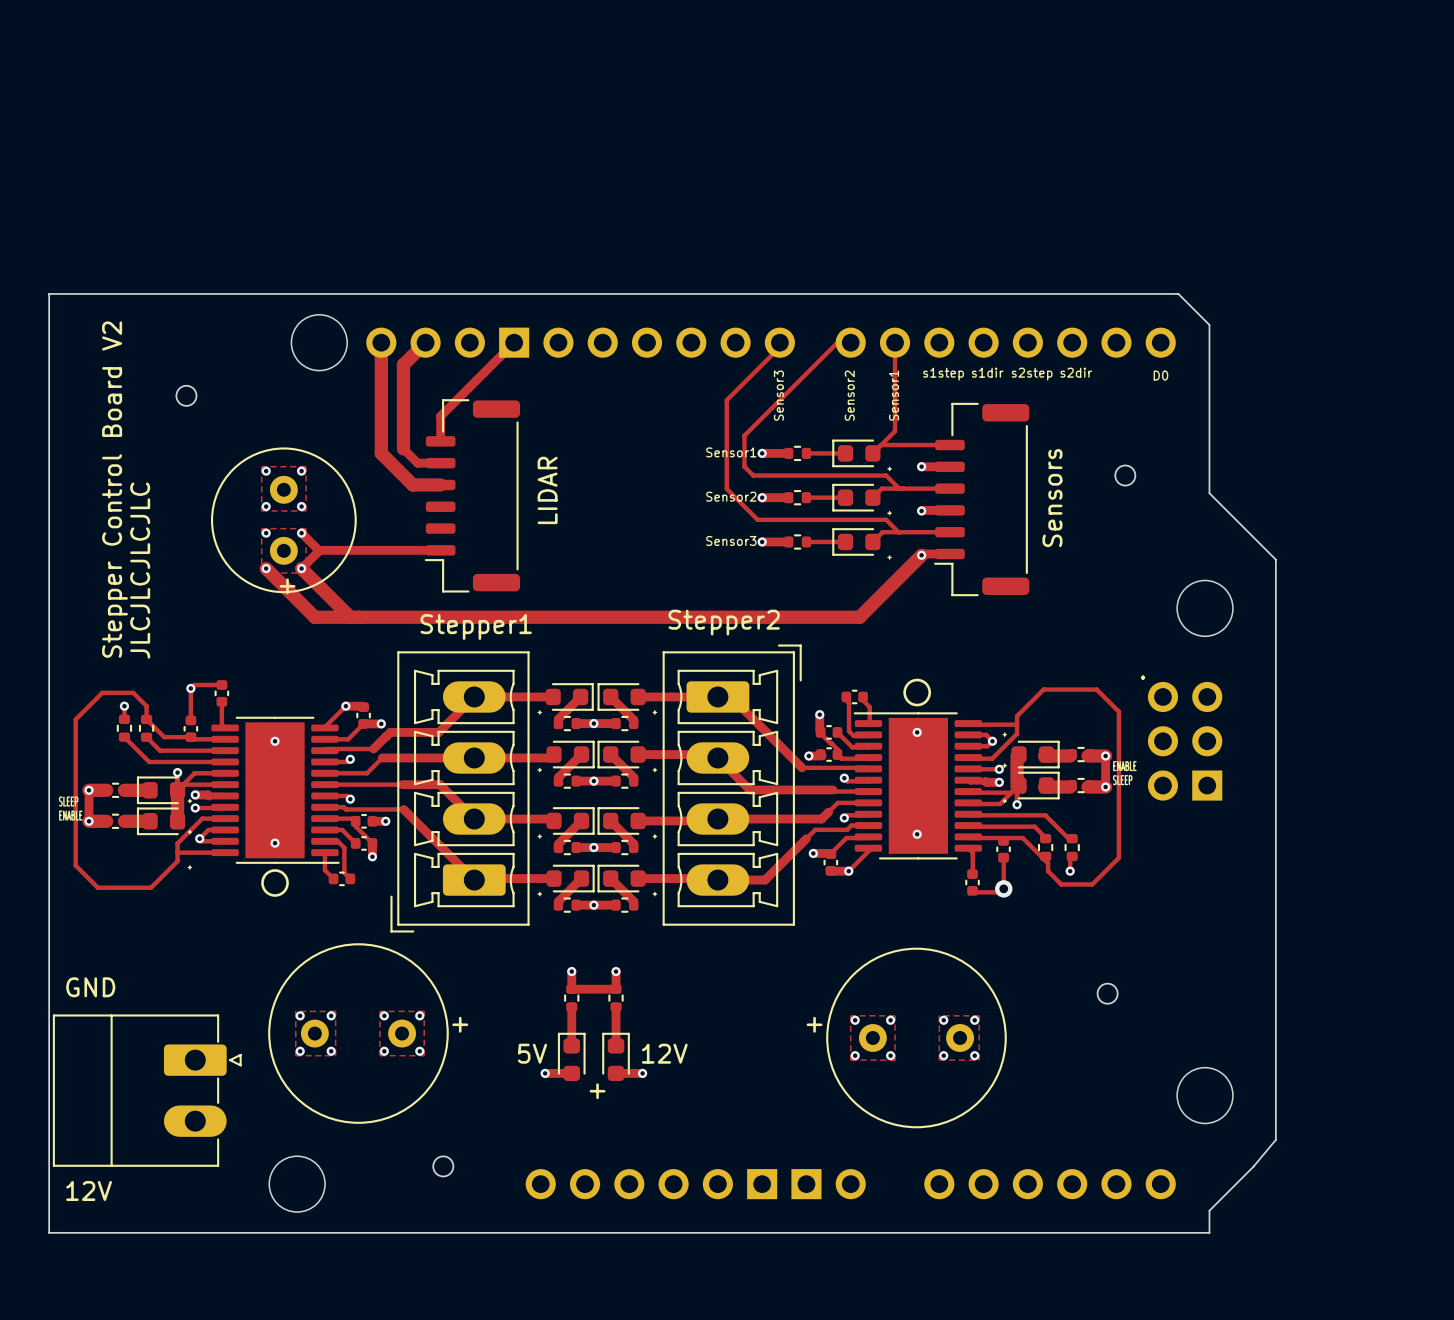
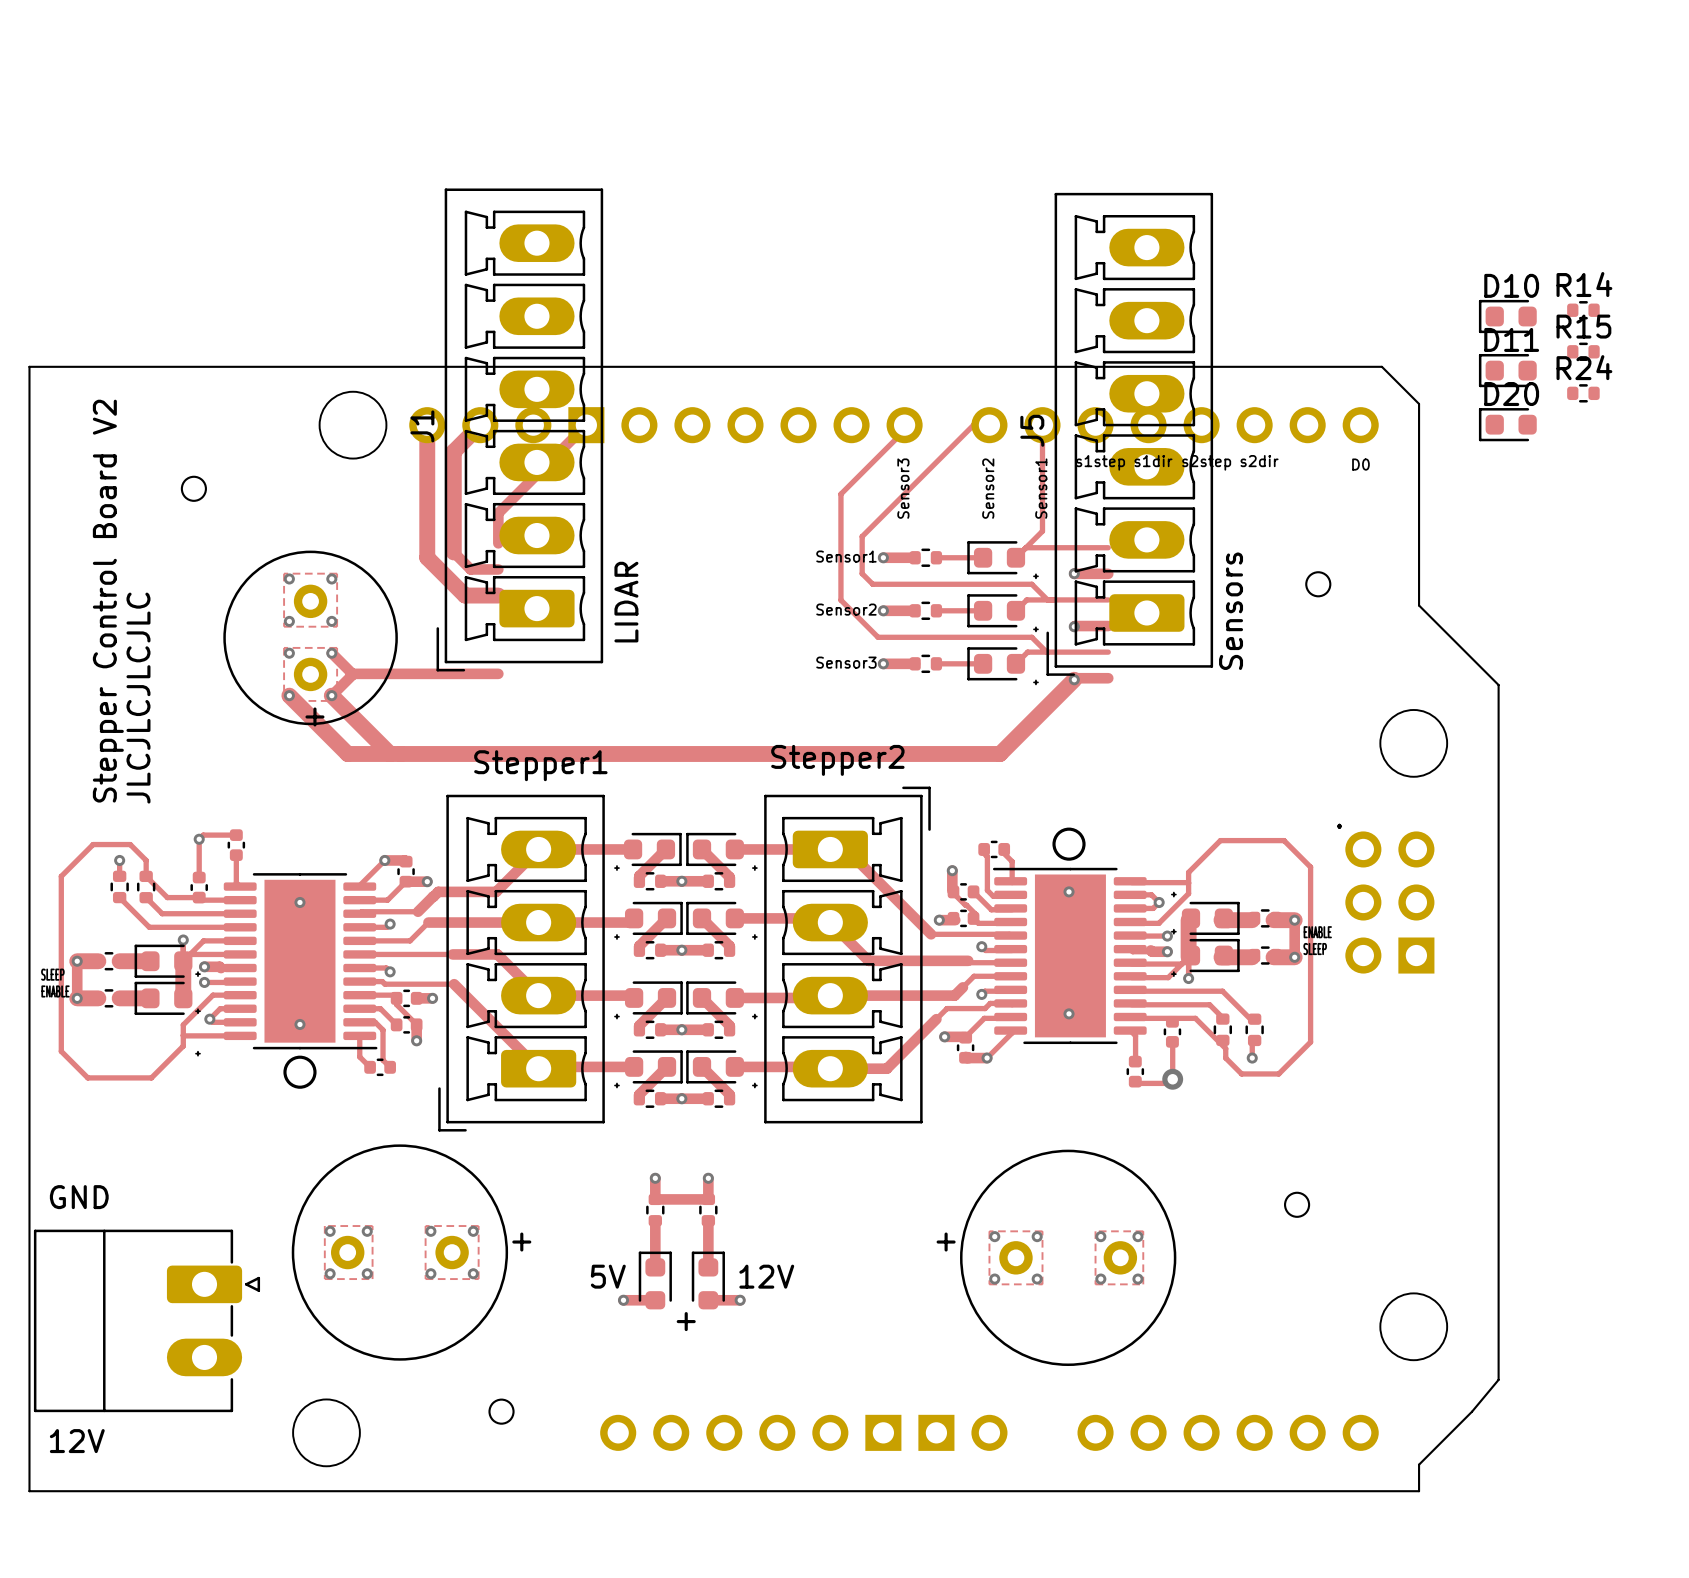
R14: none -> (1583, 310)
D10: none -> (1507, 316)
R15: none -> (1583, 351)
D11: none -> (1507, 370)
R24: none -> (1583, 393)
D20: none -> (1507, 424)
J1: none -> (519, 429)
J5: none -> (1129, 434)
part: (472, 495) -> none
part: (981, 499) -> none

